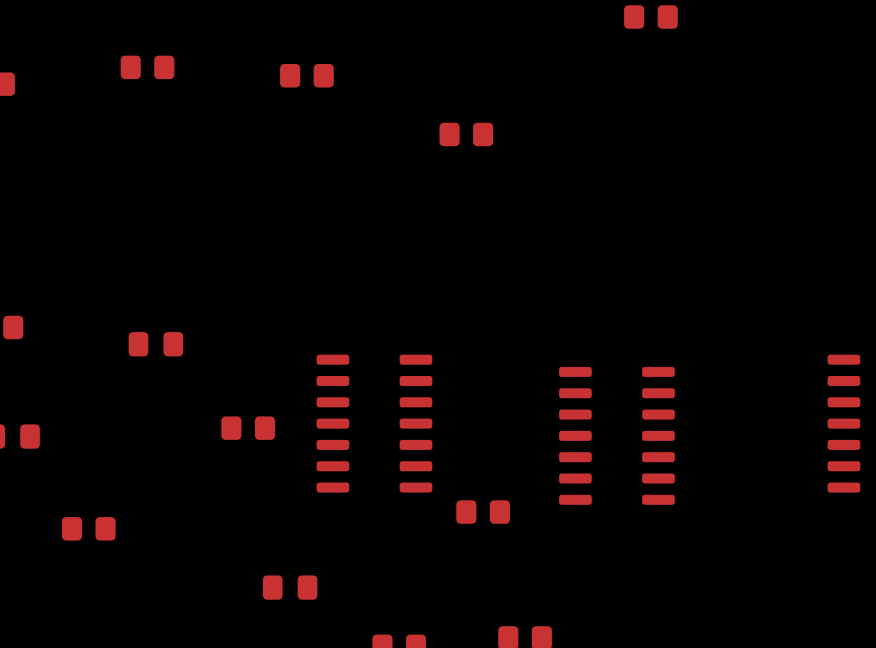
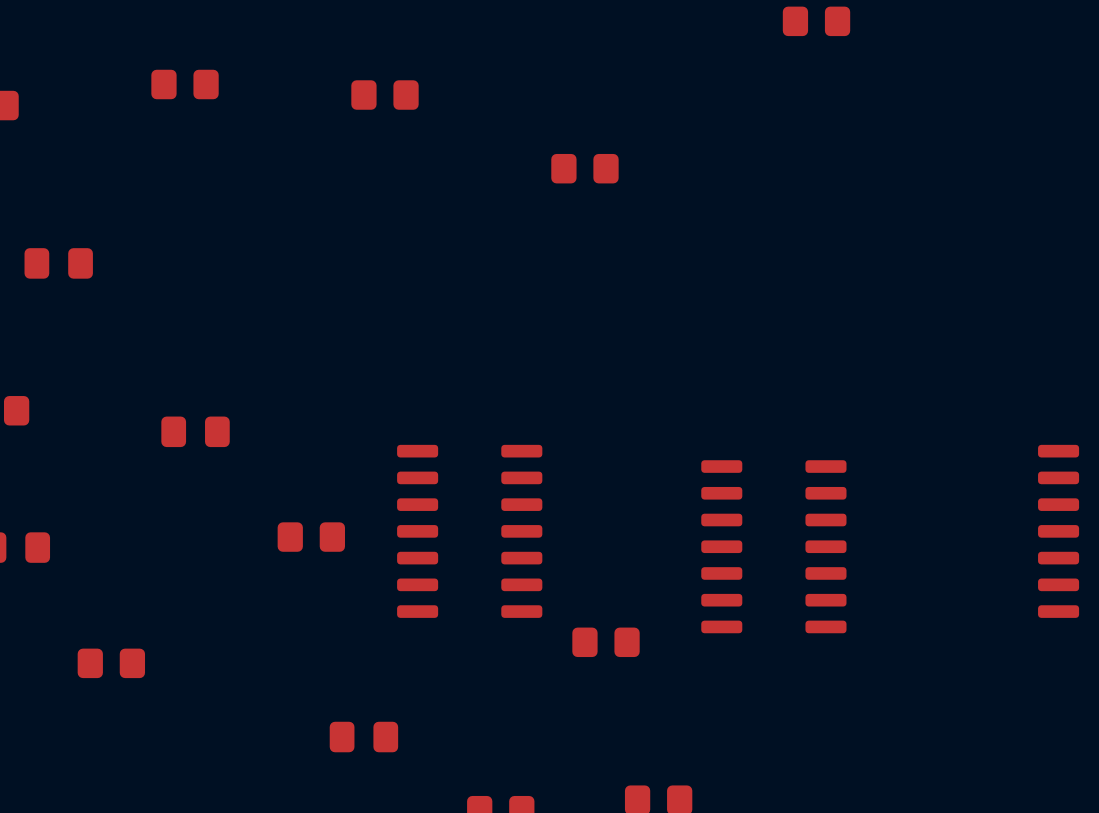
part: none -> (58, 263)

